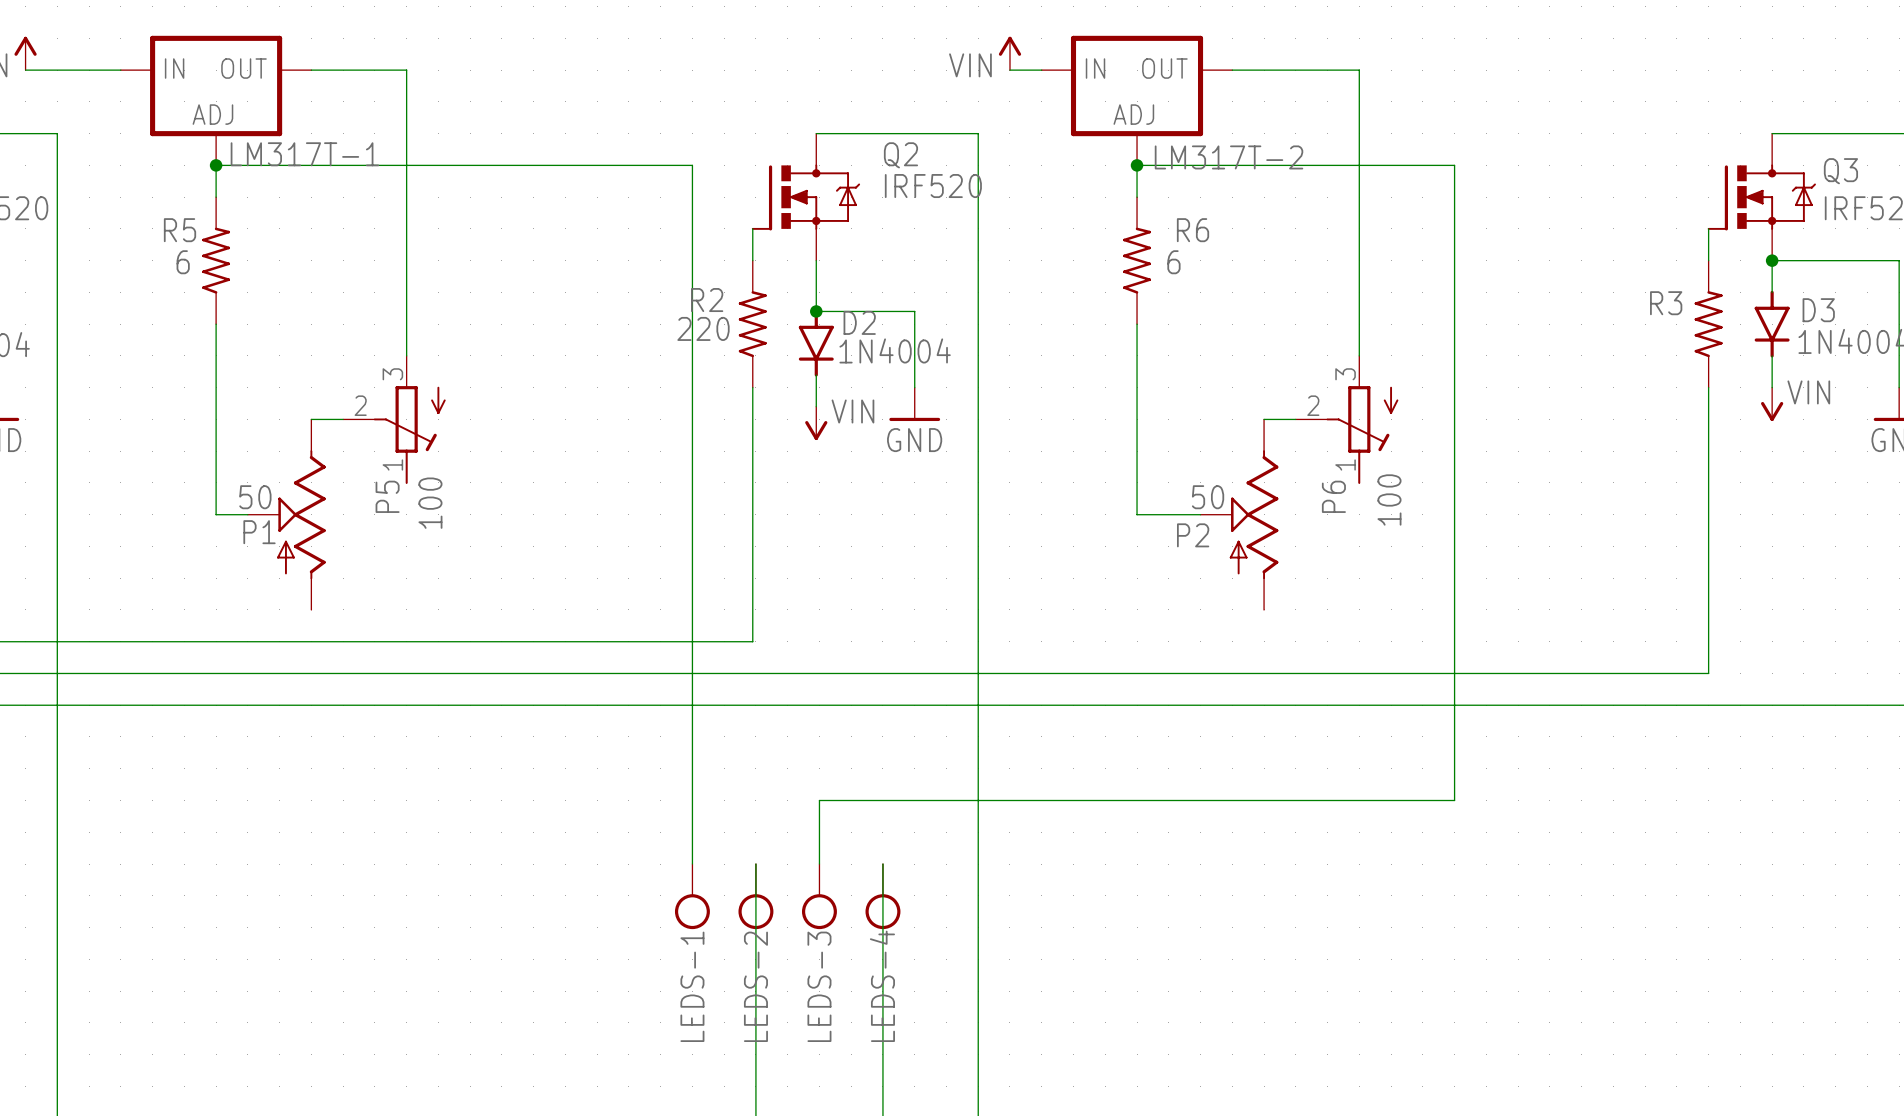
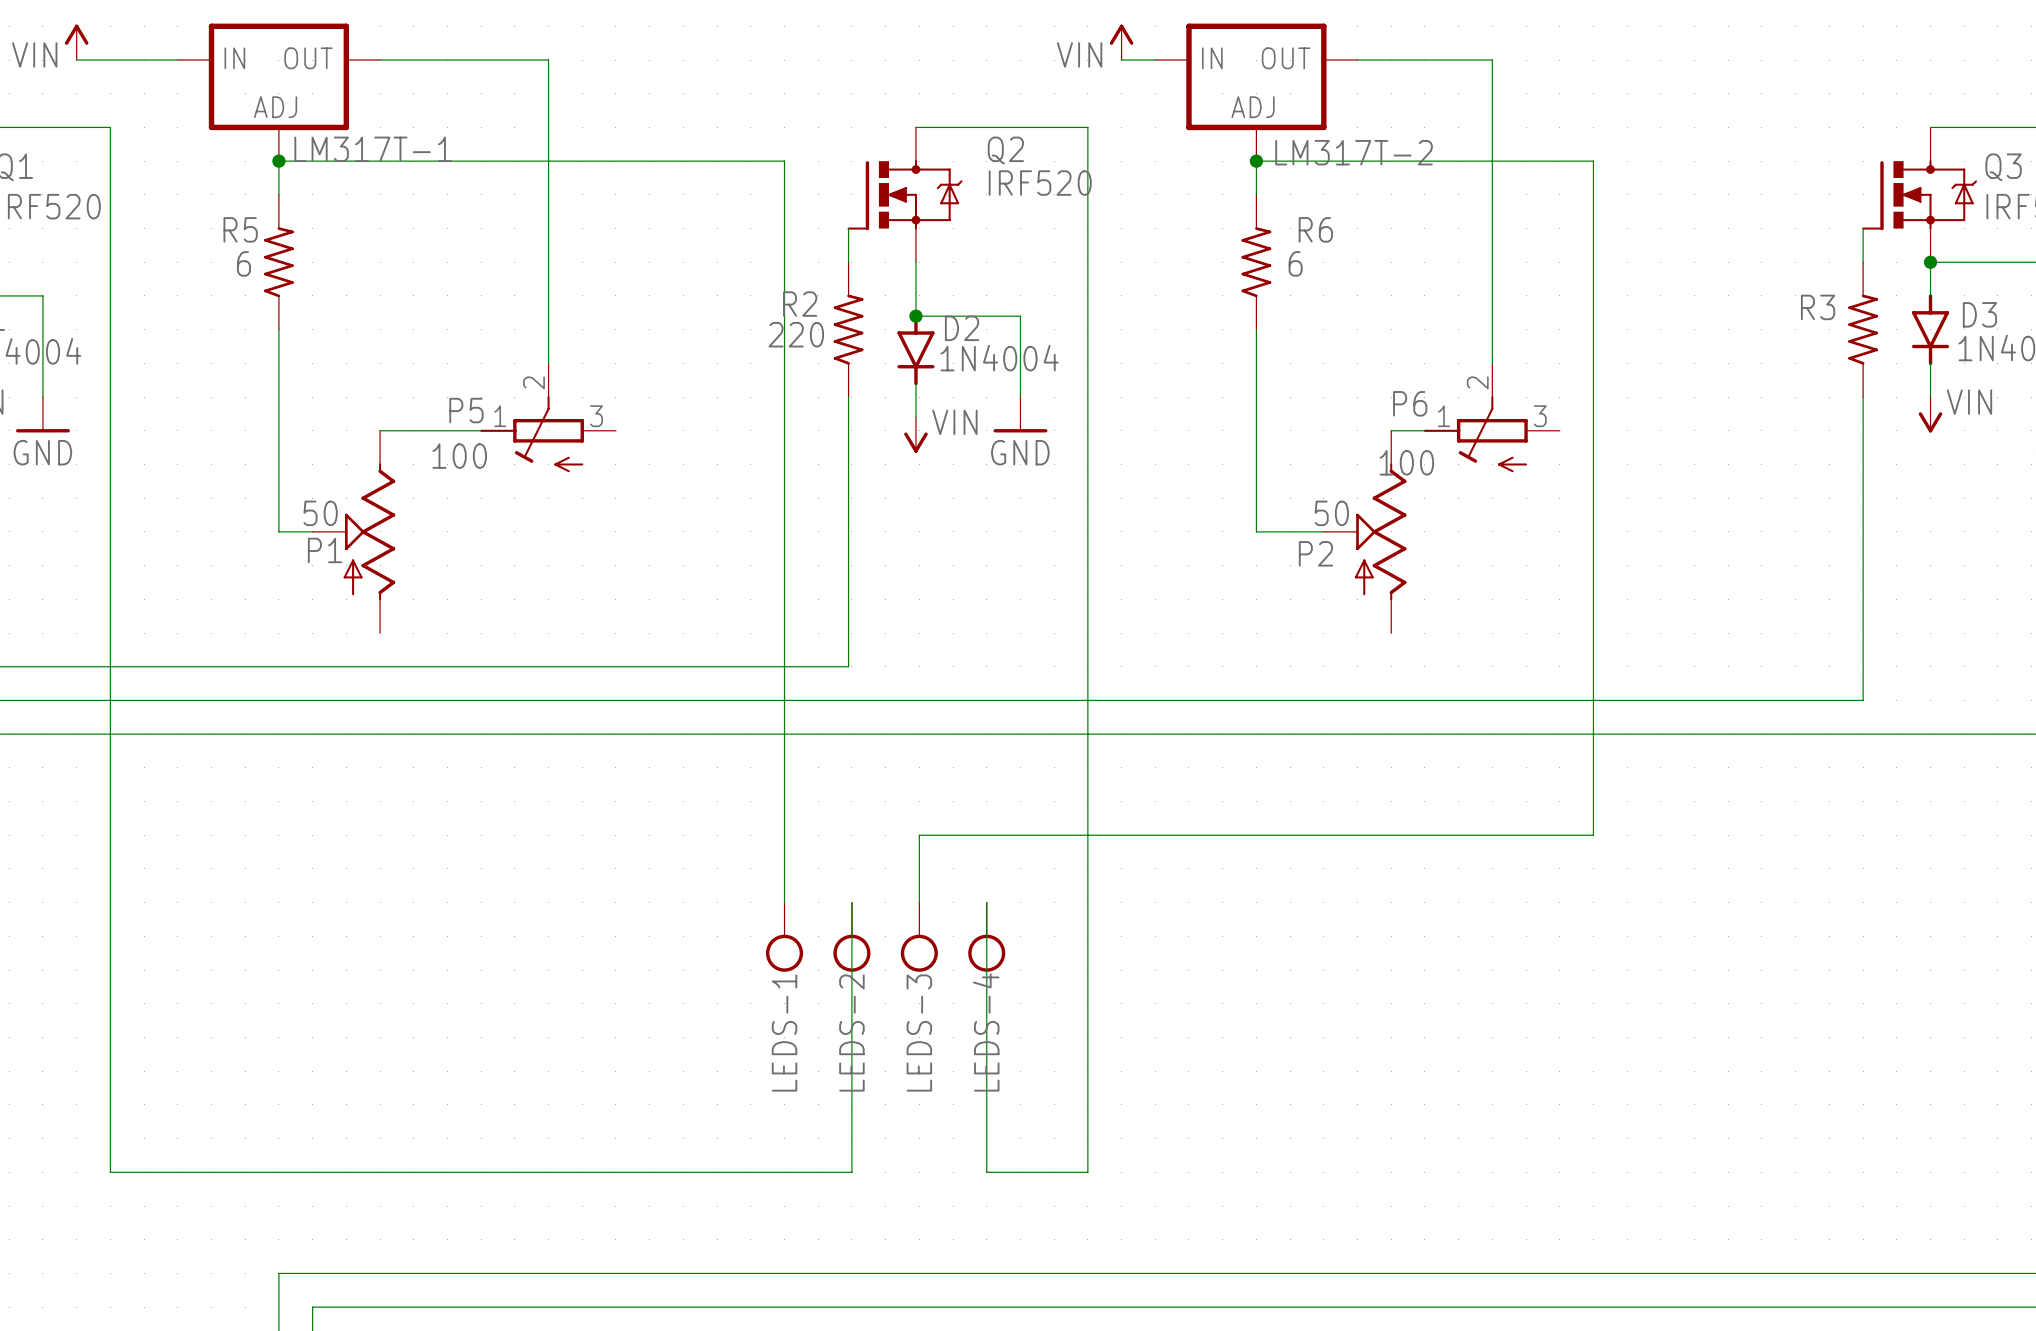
wire: (406, 70) (406, 355) -> (481, 60) (548, 60) (548, 363)
P5 rotation: 0° (409, 434) -> 90° clockwise (532, 434)
P6 rotation: 0° (1362, 434) -> 90° clockwise (1475, 434)

